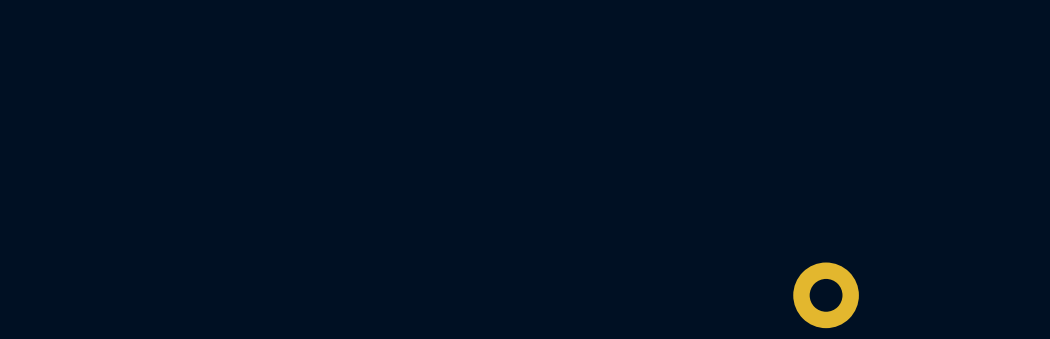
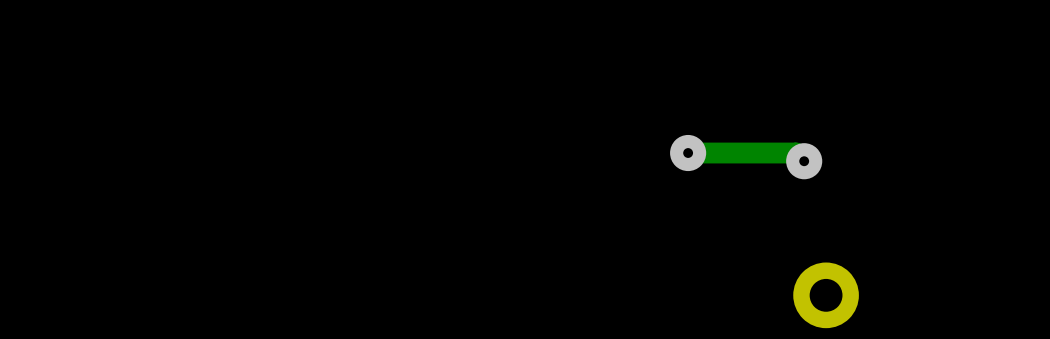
track: none -> (688, 153) (795, 153) (804, 161)
via: none -> (688, 153)
via: none -> (804, 161)

